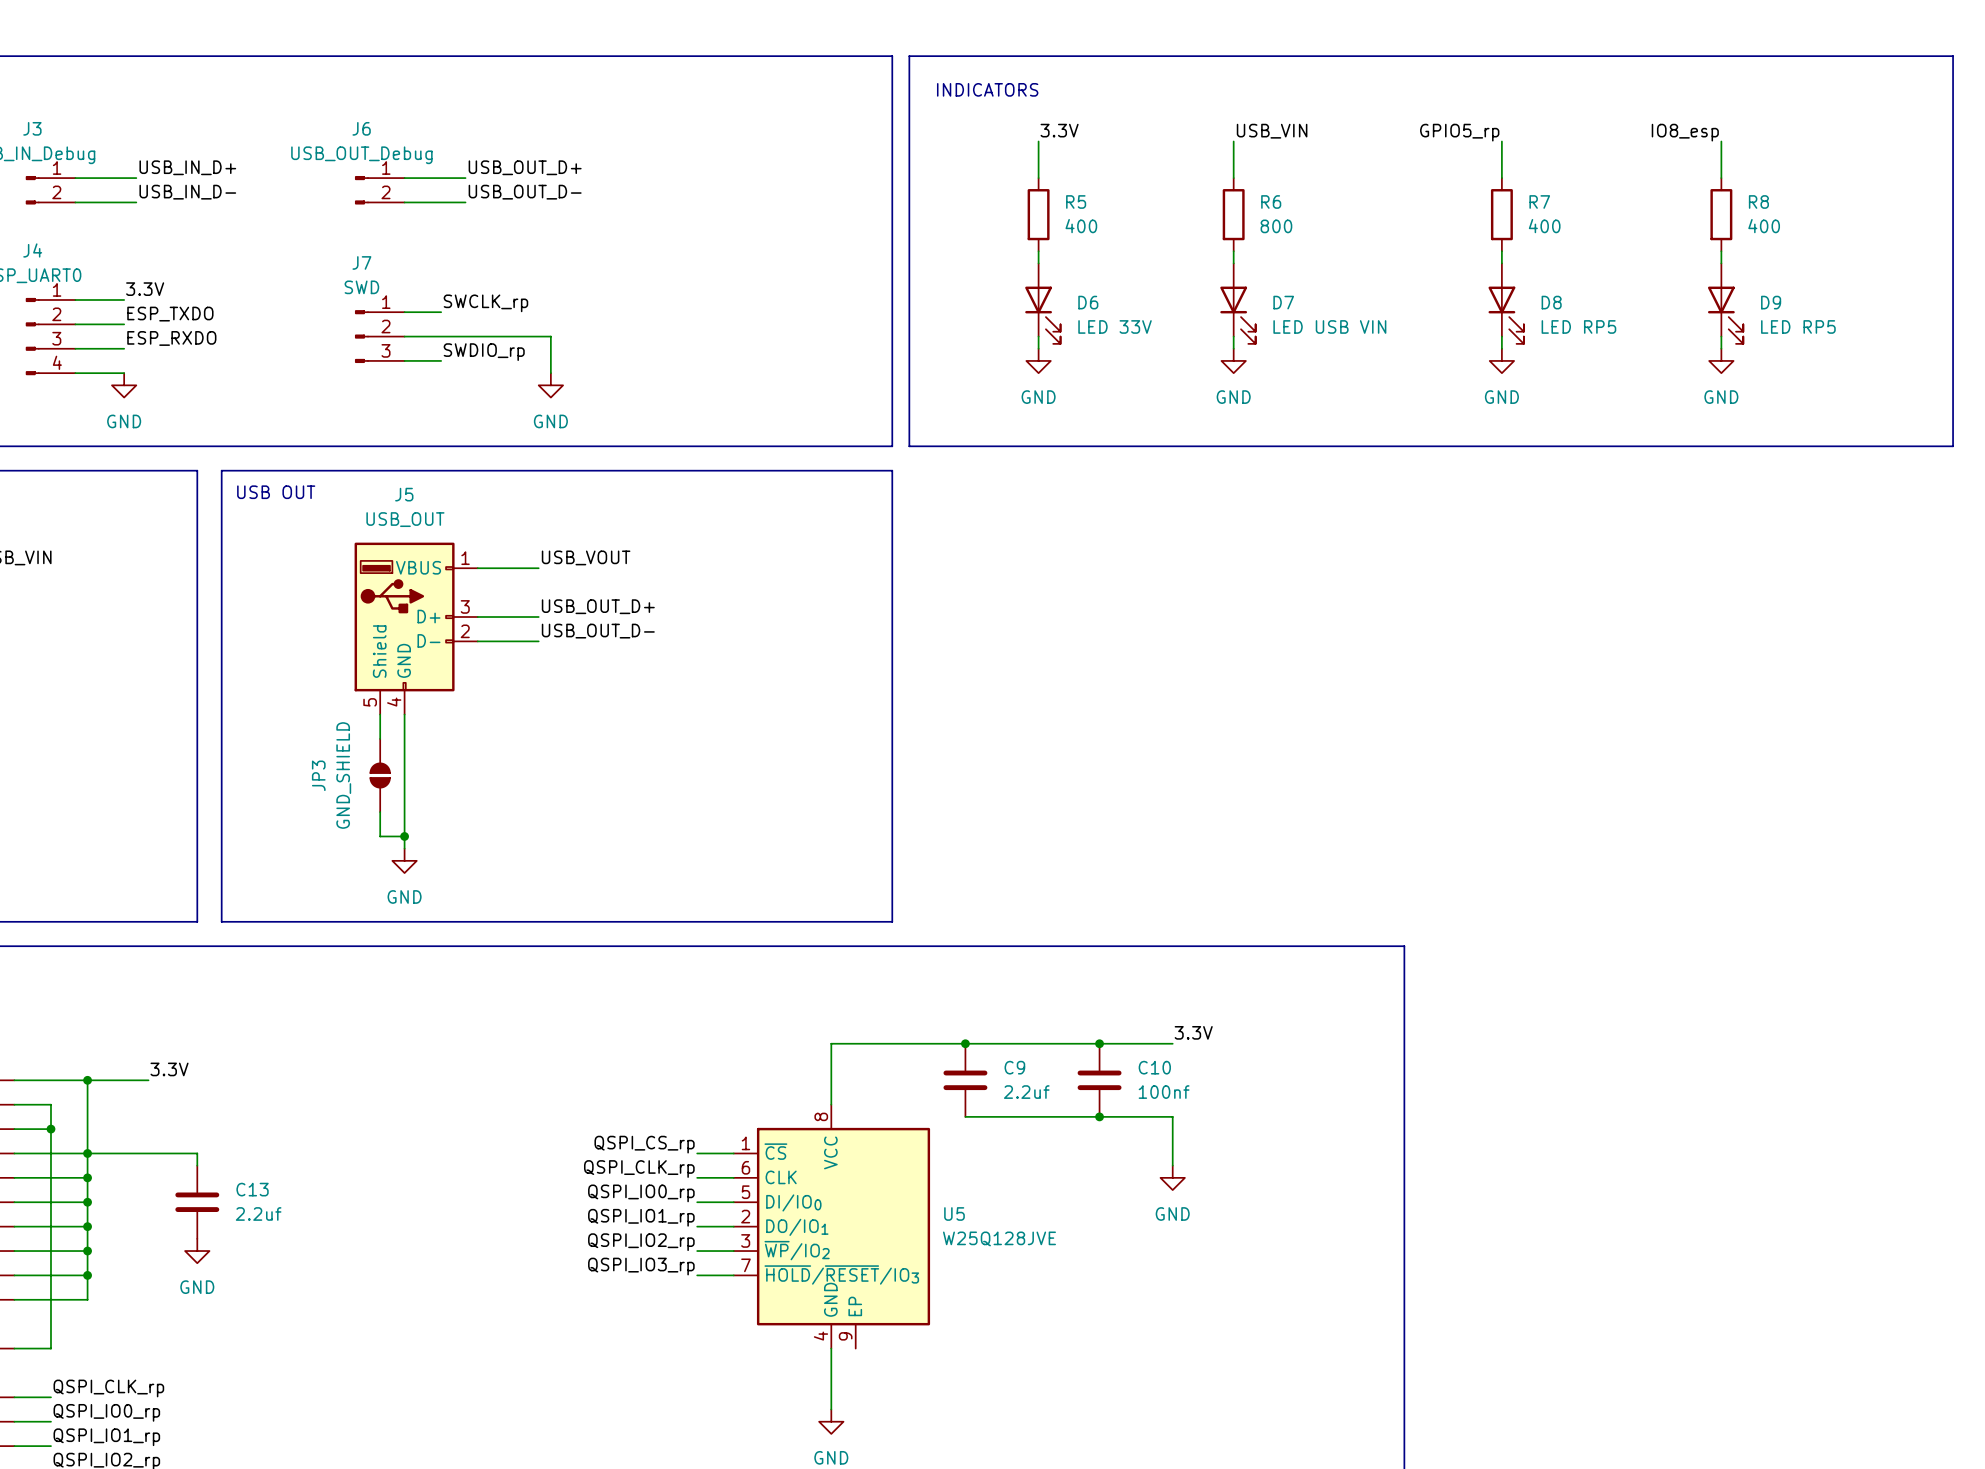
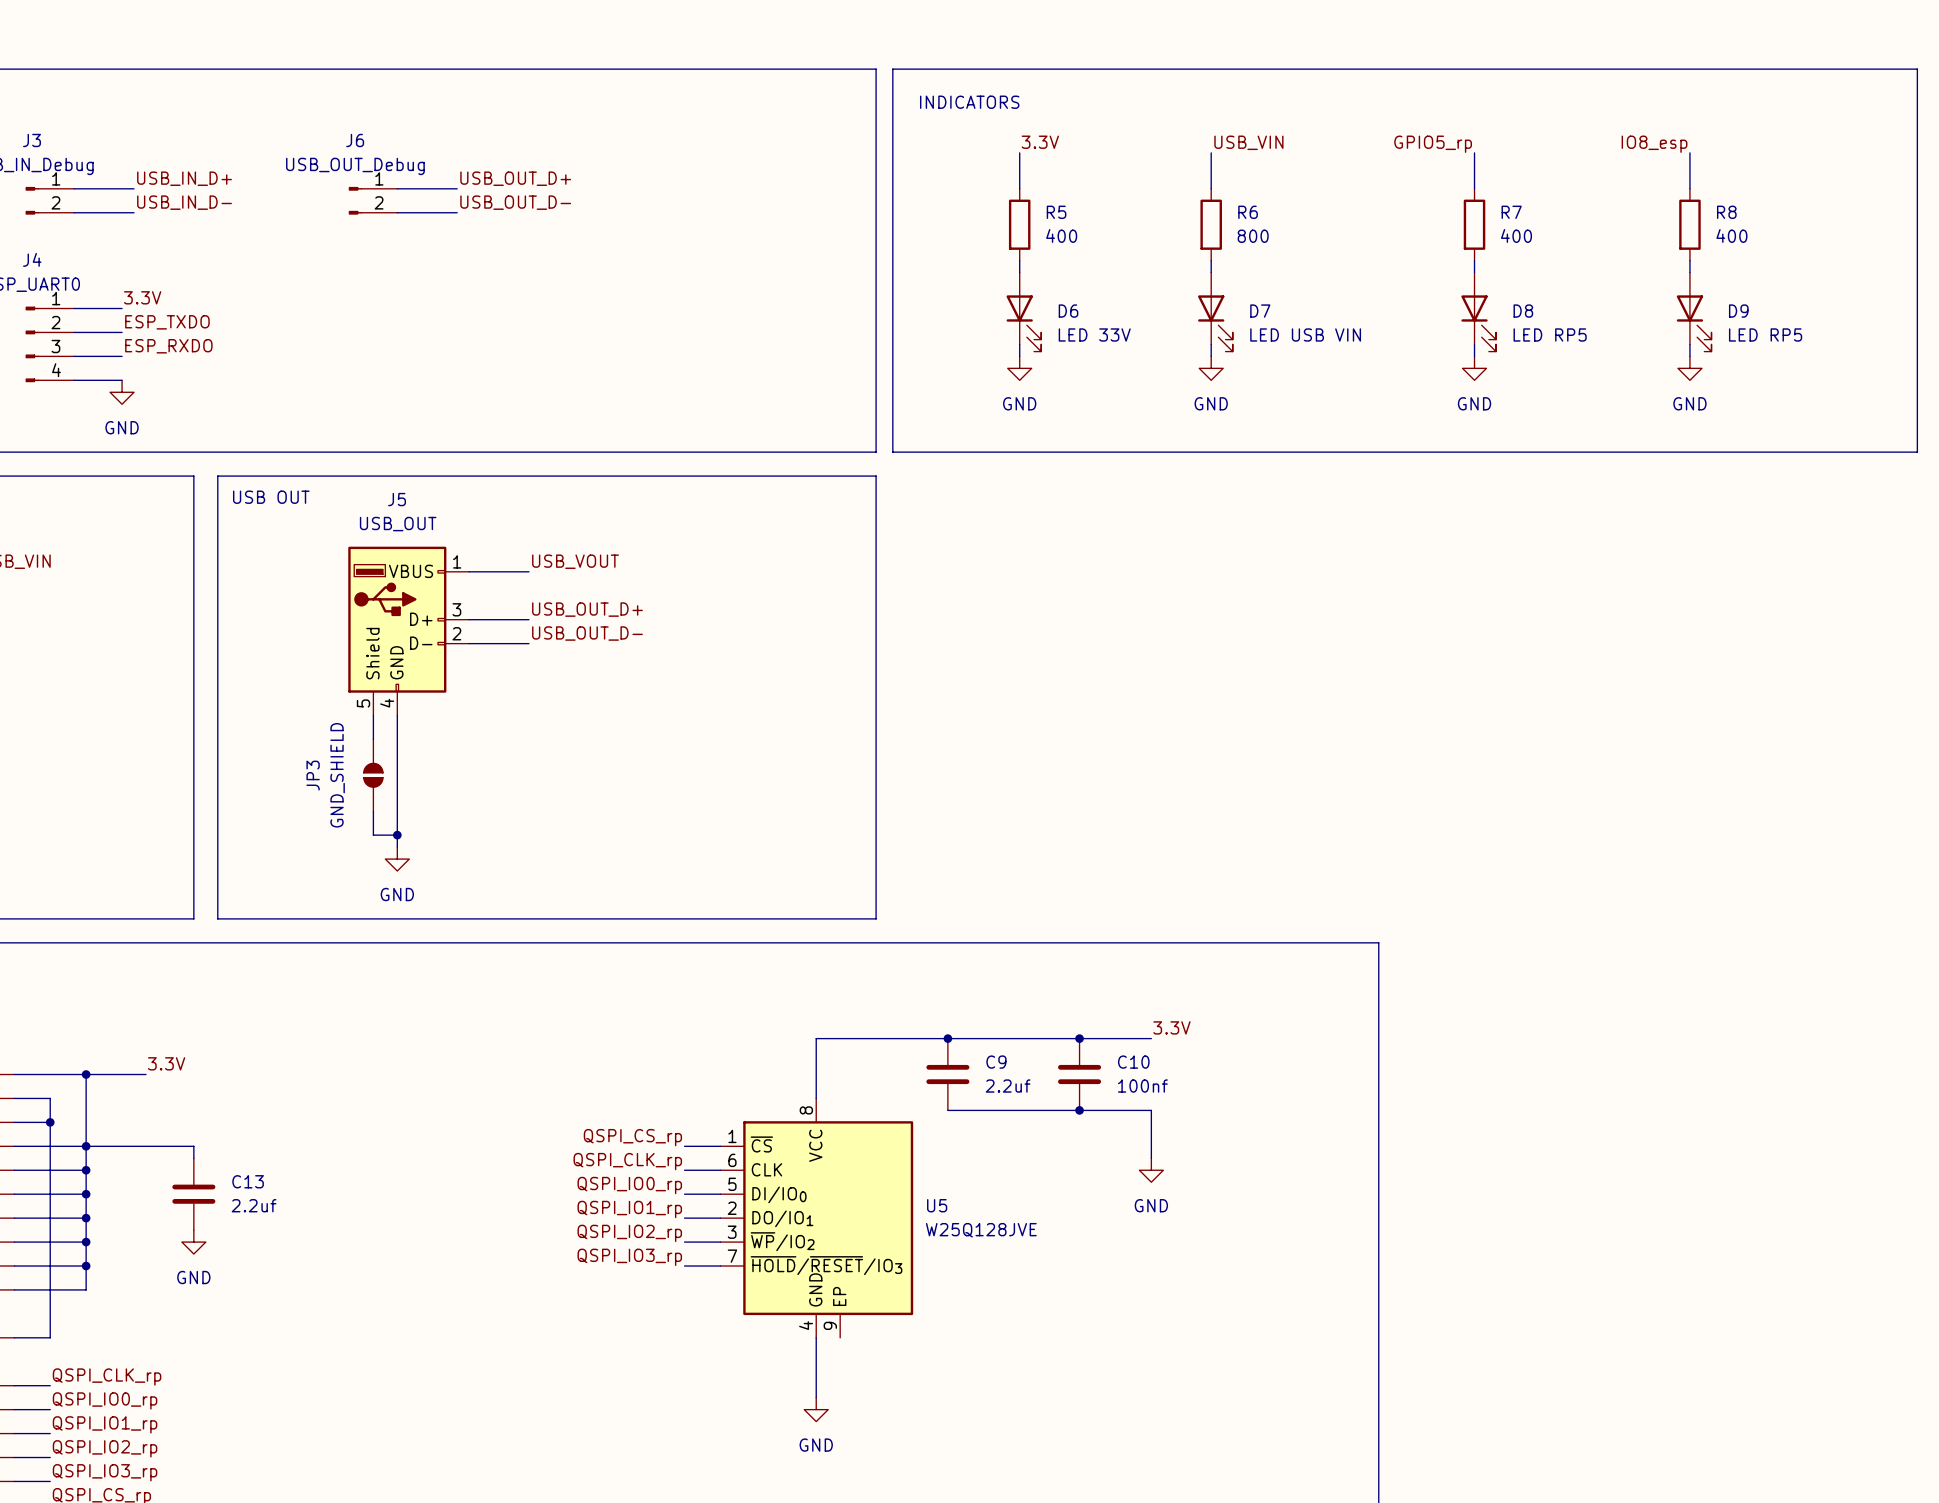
label: SWCLK_rp (485, 303) -> none
wire: (404, 312) (441, 312) -> none
J7: SWD (379, 336) -> none
wire: (404, 336) (550, 336) (550, 373) -> none
label: SWDIO_rp (484, 352) -> none
wire: (404, 360) (441, 360) -> none
power symbol: GND (550, 385) -> none

